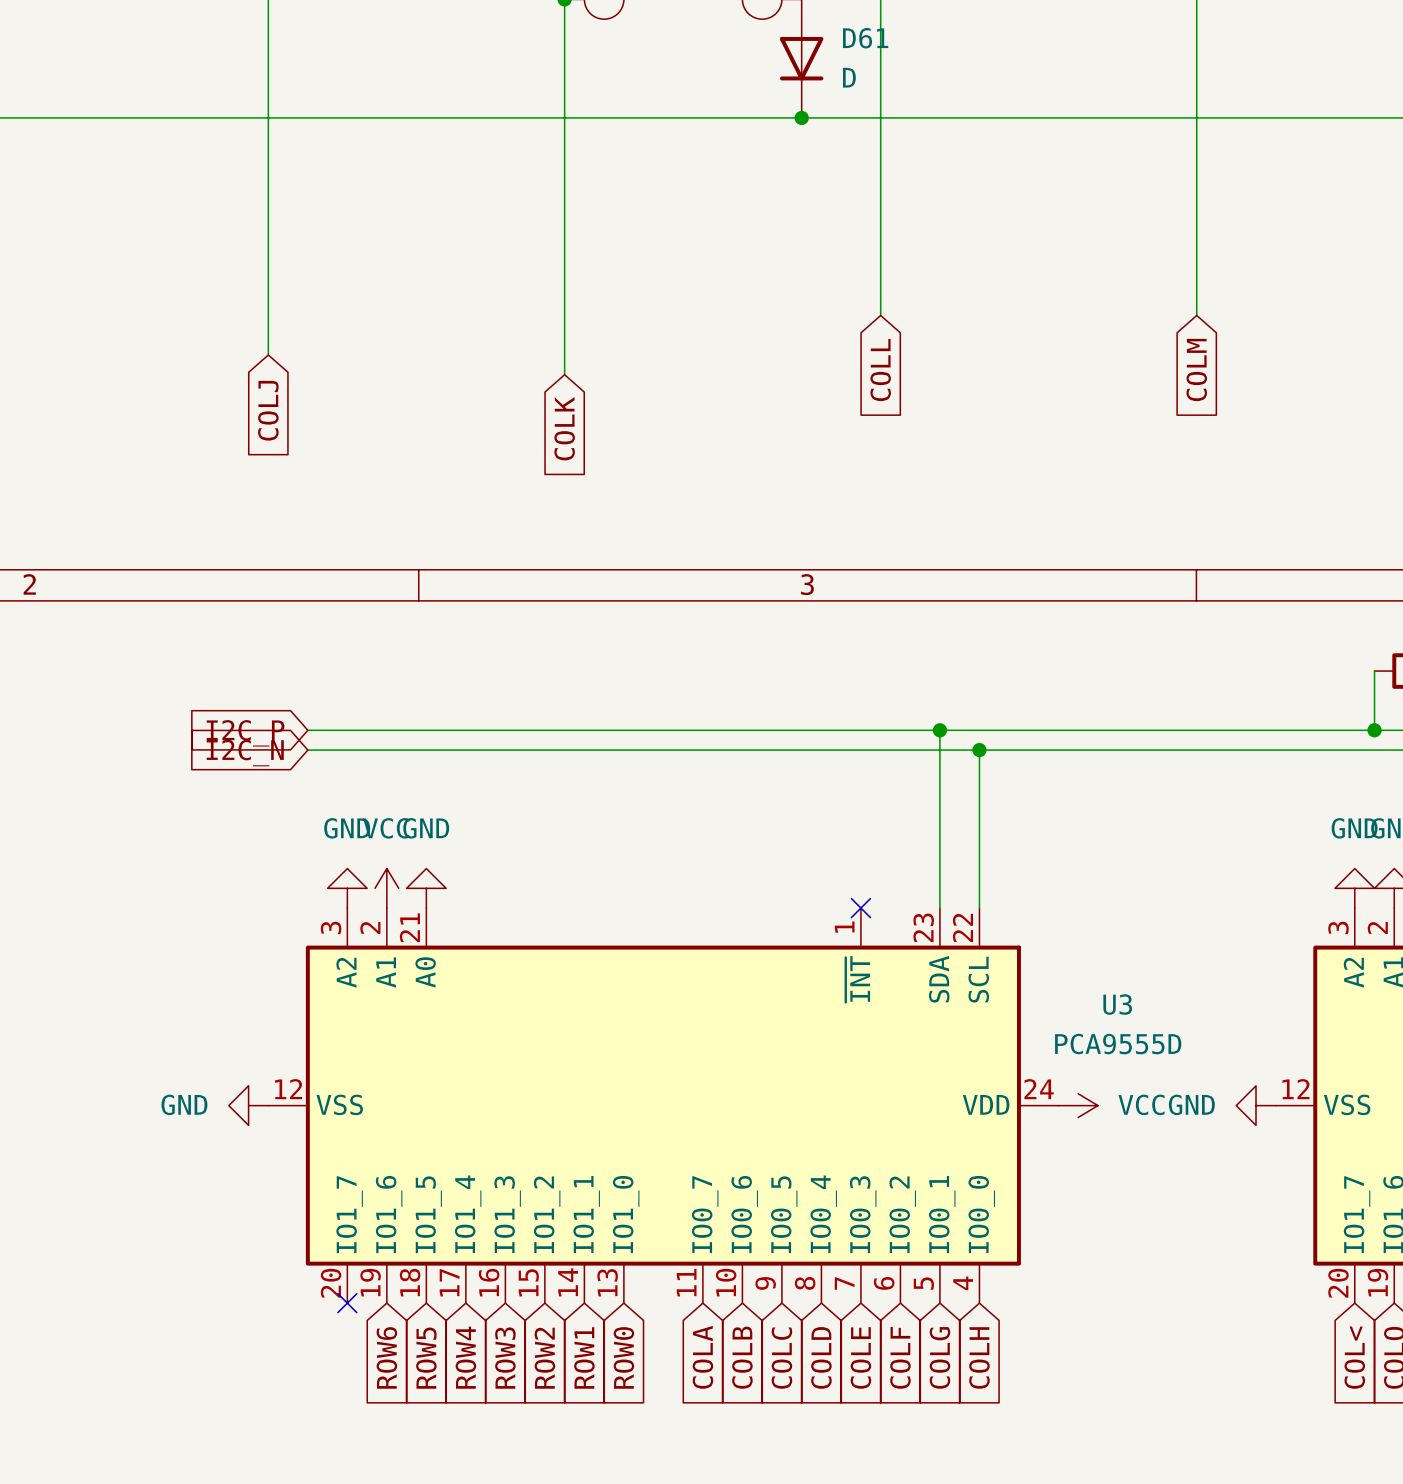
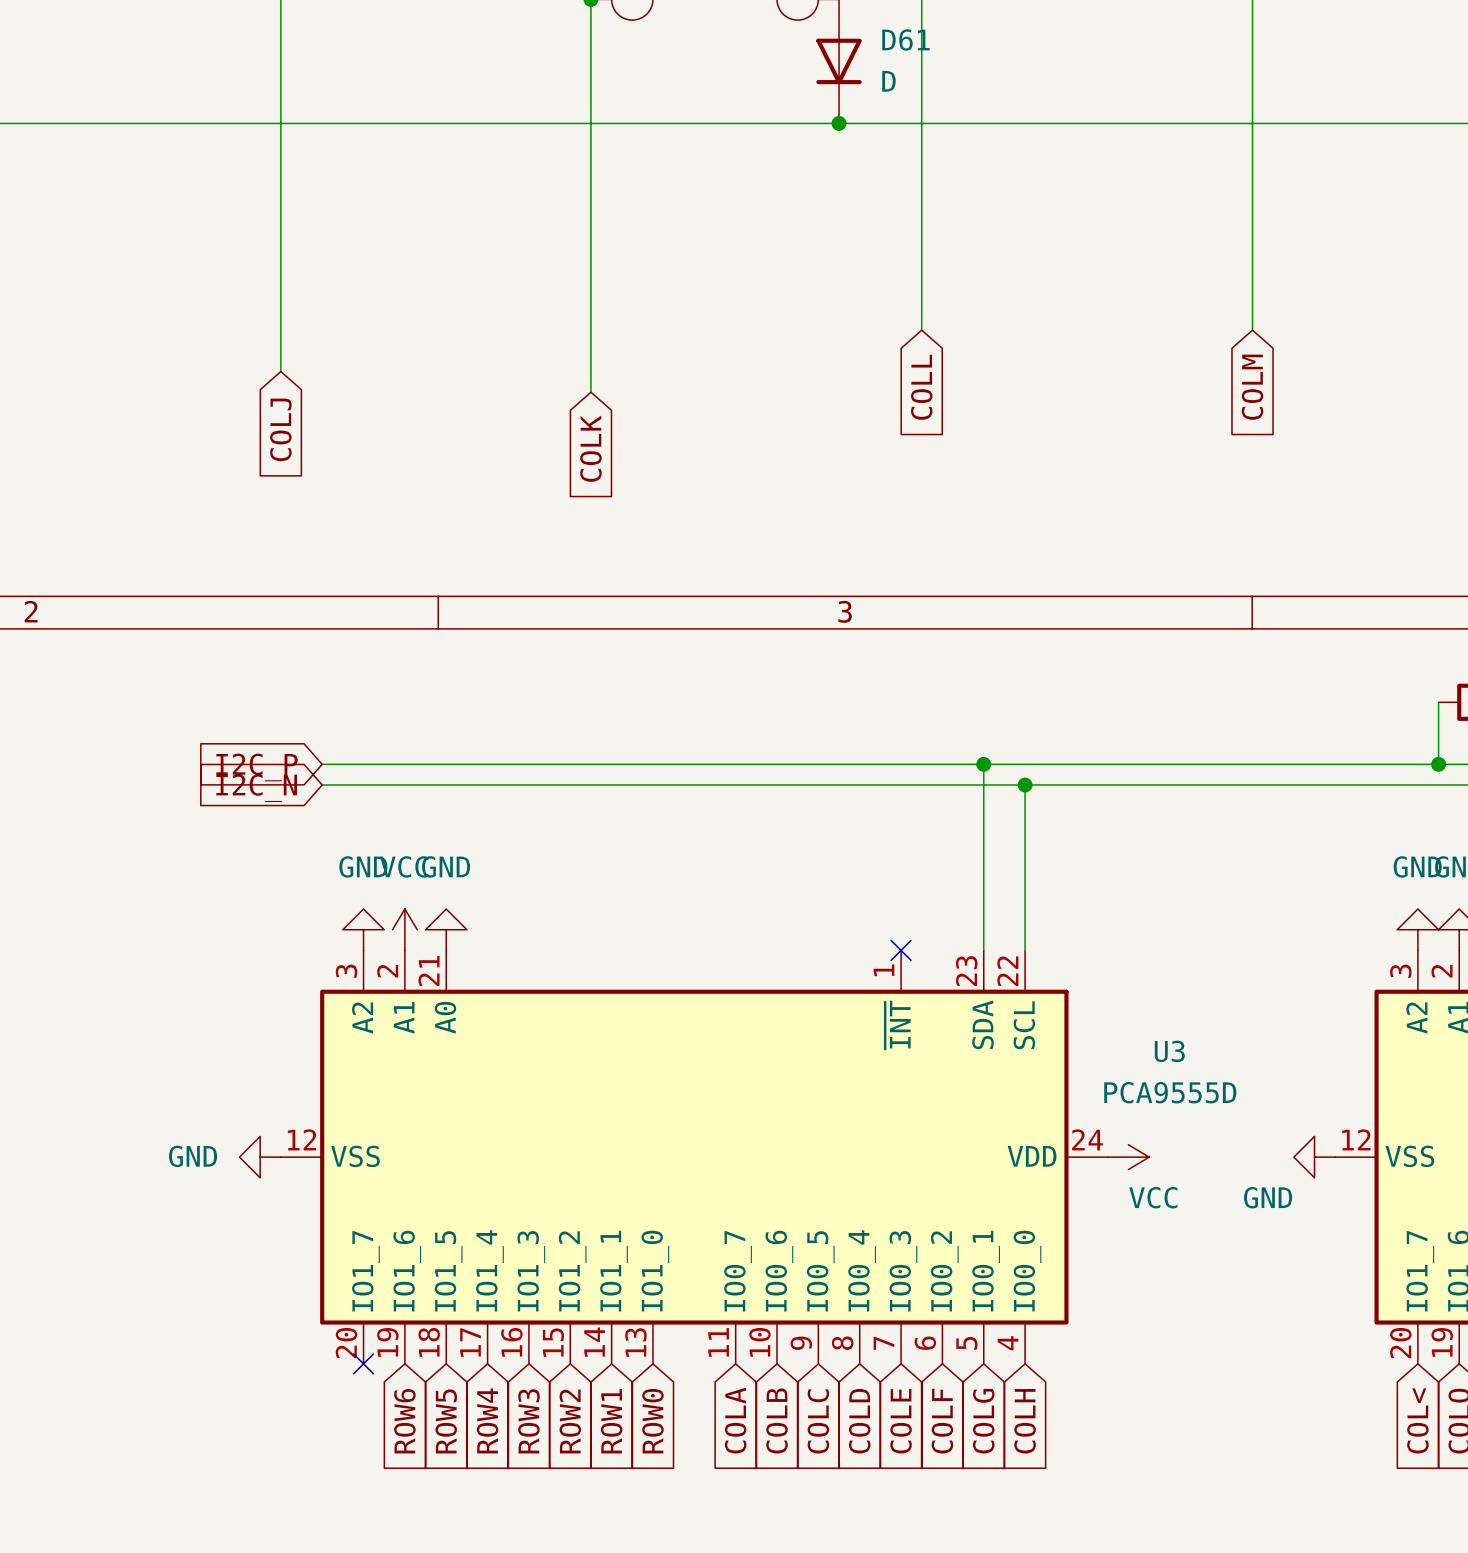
power symbol text position: VCC (1141, 1104) -> VCC (1153, 1197)
power symbol text position: GND (1191, 1104) -> GND (1268, 1197)

